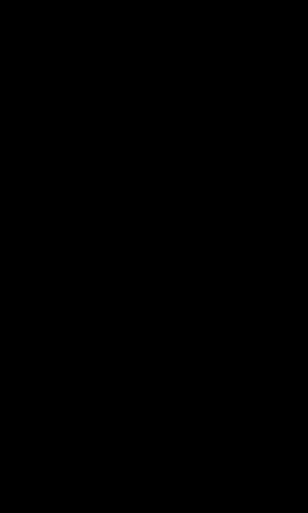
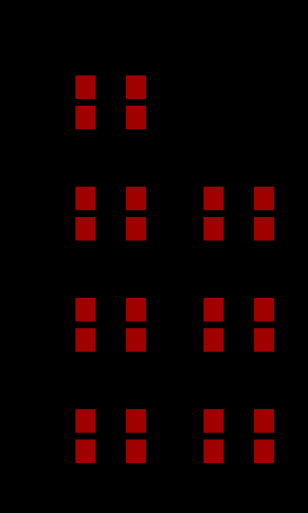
part: none -> (110, 102)
part: none -> (110, 213)
part: none -> (238, 213)
part: none -> (110, 324)
part: none -> (238, 324)
part: none -> (110, 436)
part: none -> (238, 436)

